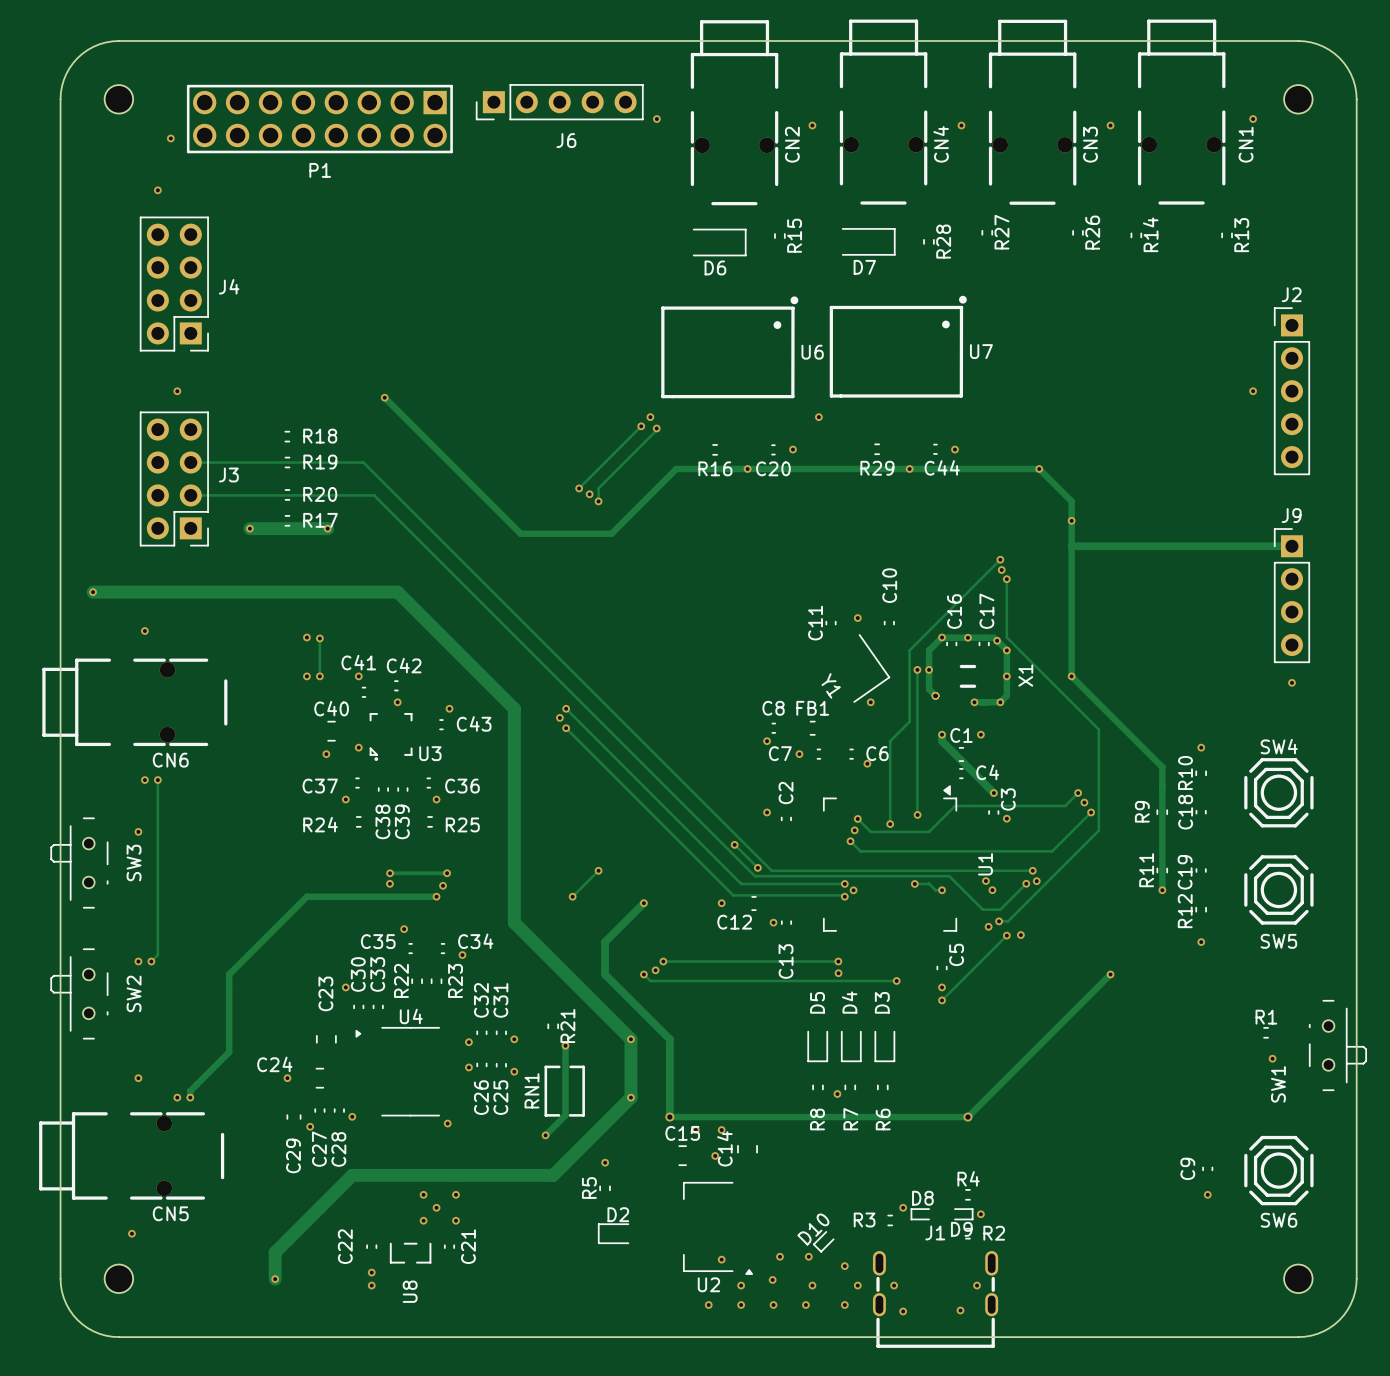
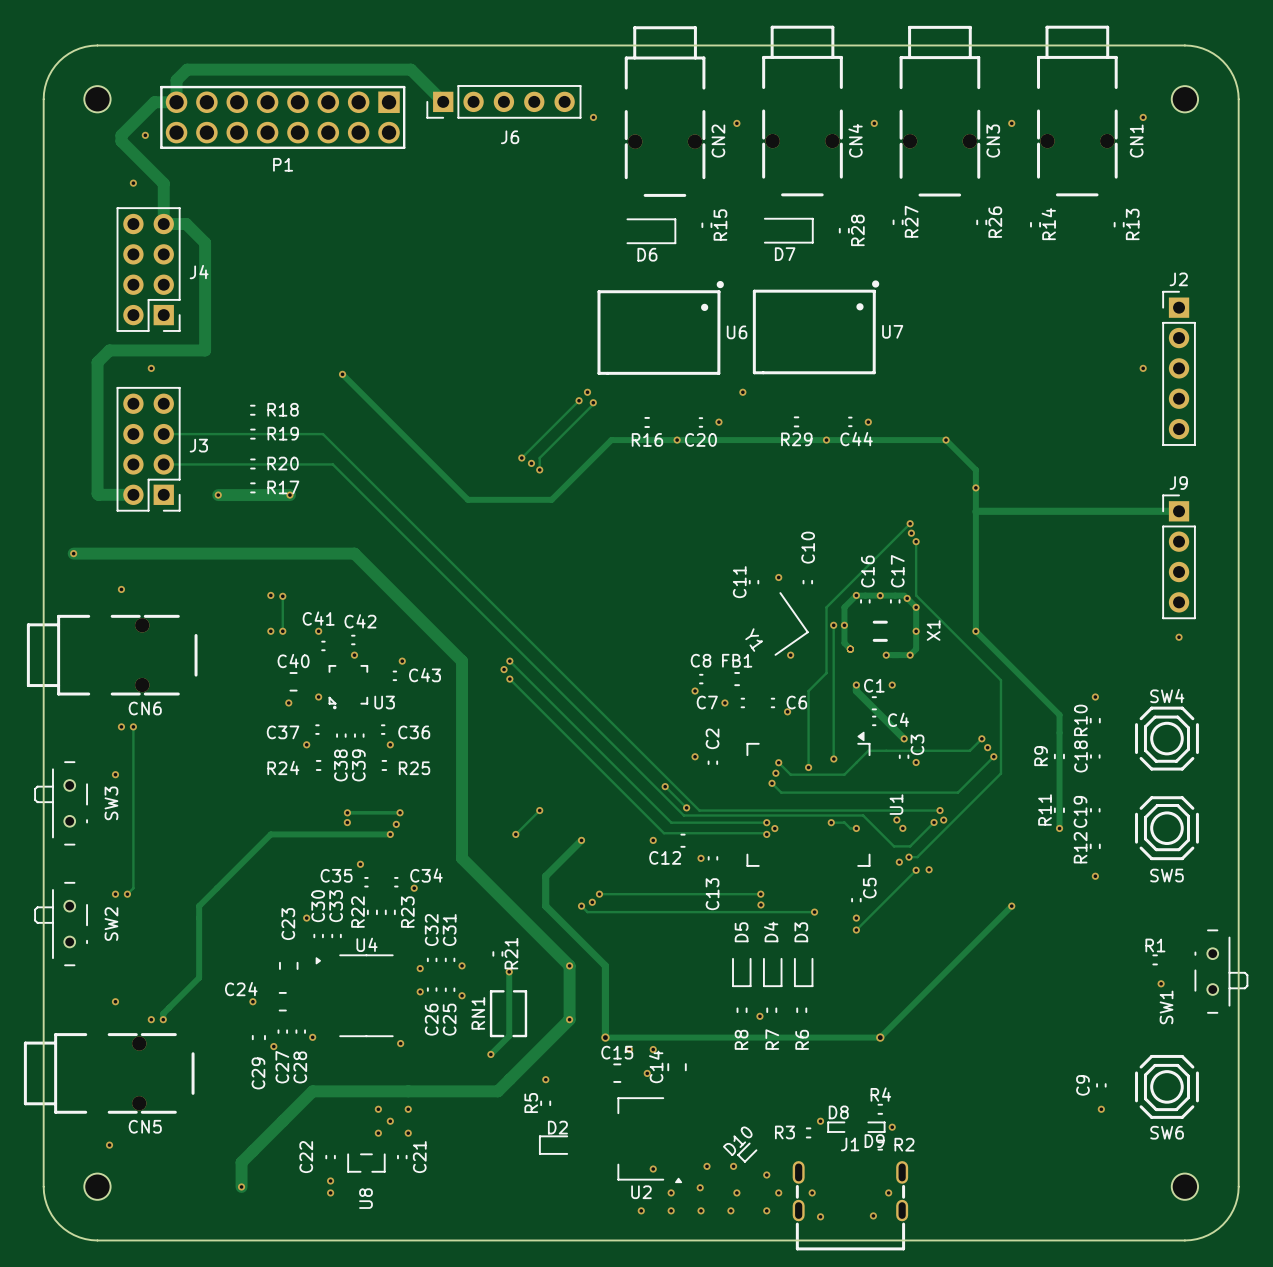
track: none -> (443, 101) (410, 69) (187, 69) (176, 80) (176, 102) (154, 102) (121, 135) (121, 141) (163, 183) (163, 224) (186, 224) (205, 242) (205, 350) (109, 350) (97, 362) (97, 493) (133, 494)

